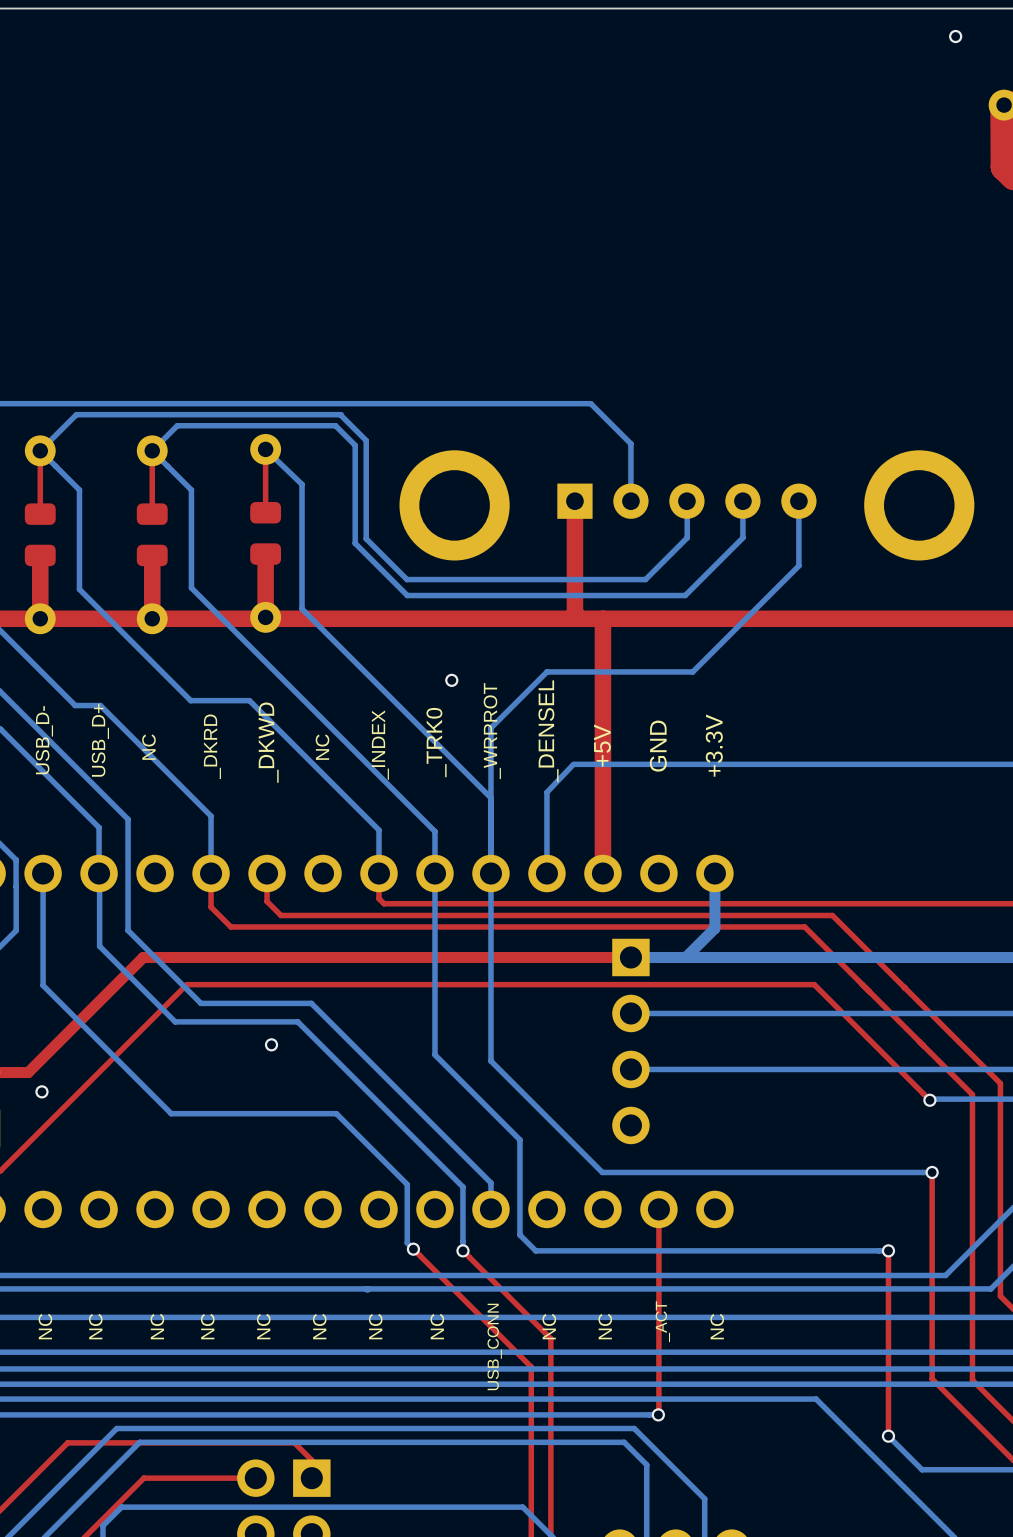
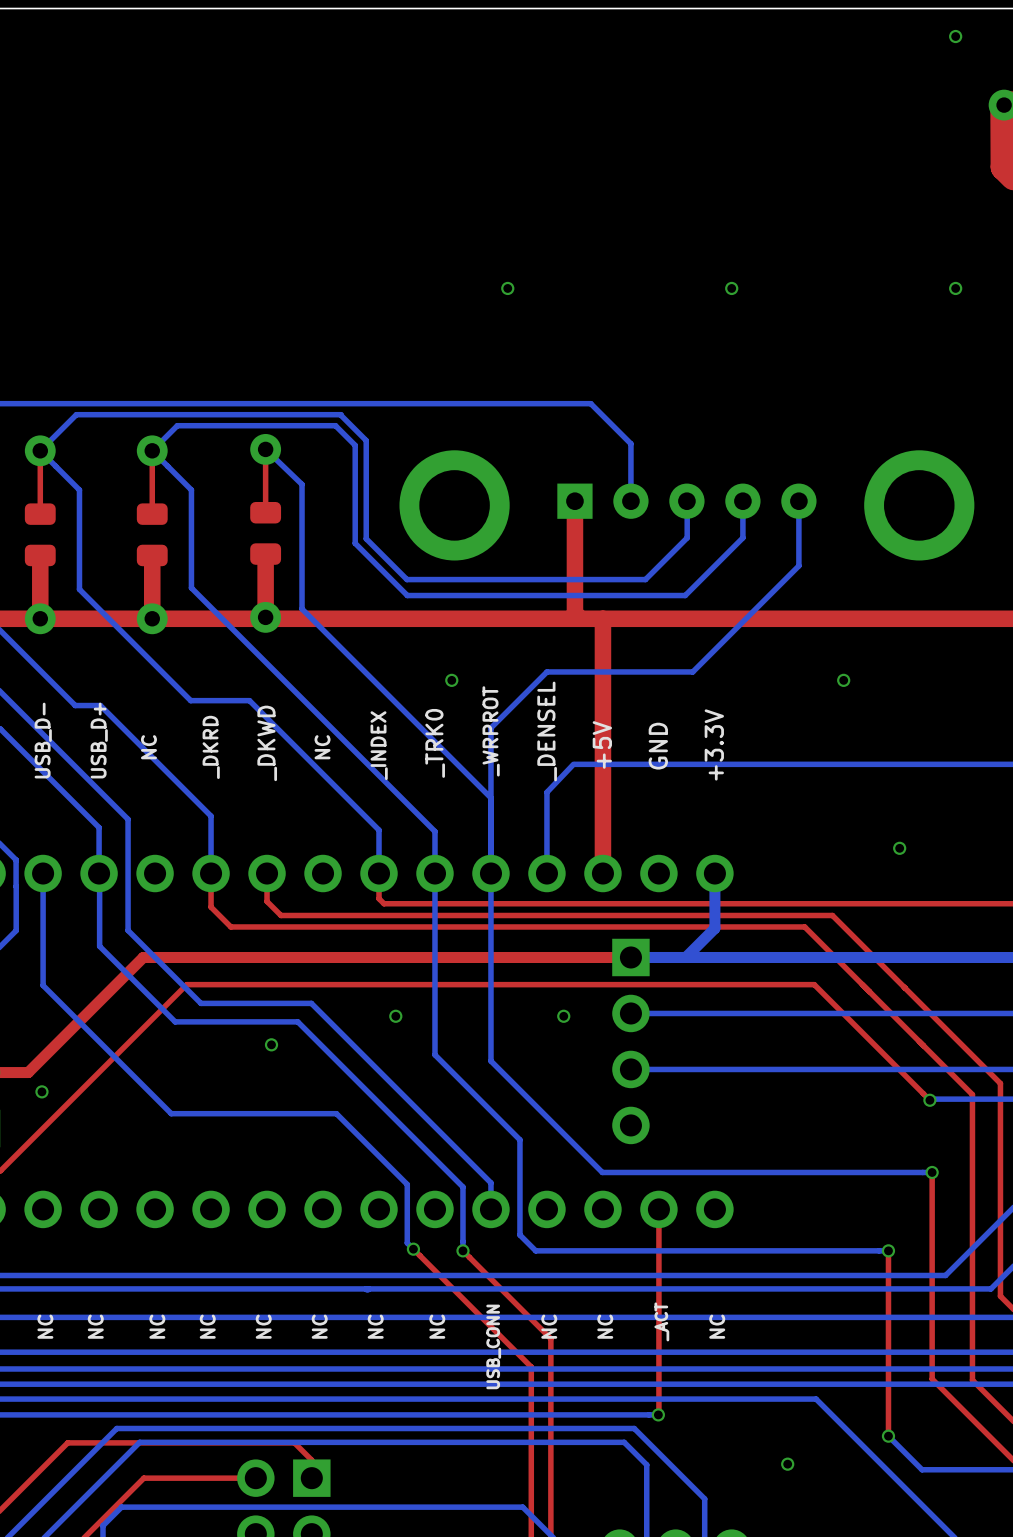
via: none -> (507, 288)
via: none -> (731, 288)
via: none -> (955, 288)
via: none -> (843, 680)
via: none -> (899, 848)
via: none -> (395, 1016)
via: none -> (563, 1016)
via: none -> (787, 1464)

